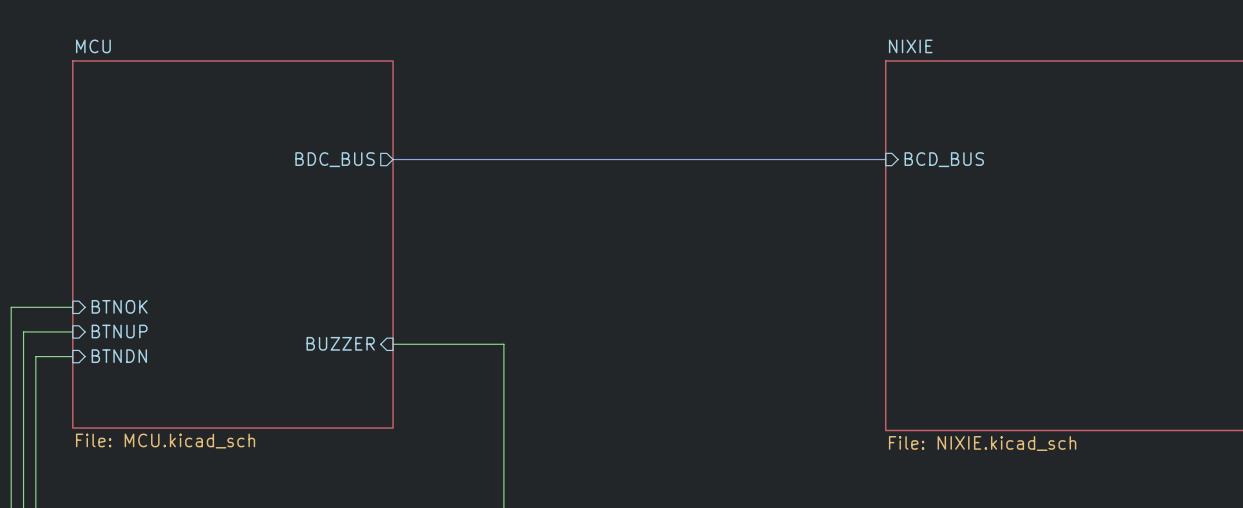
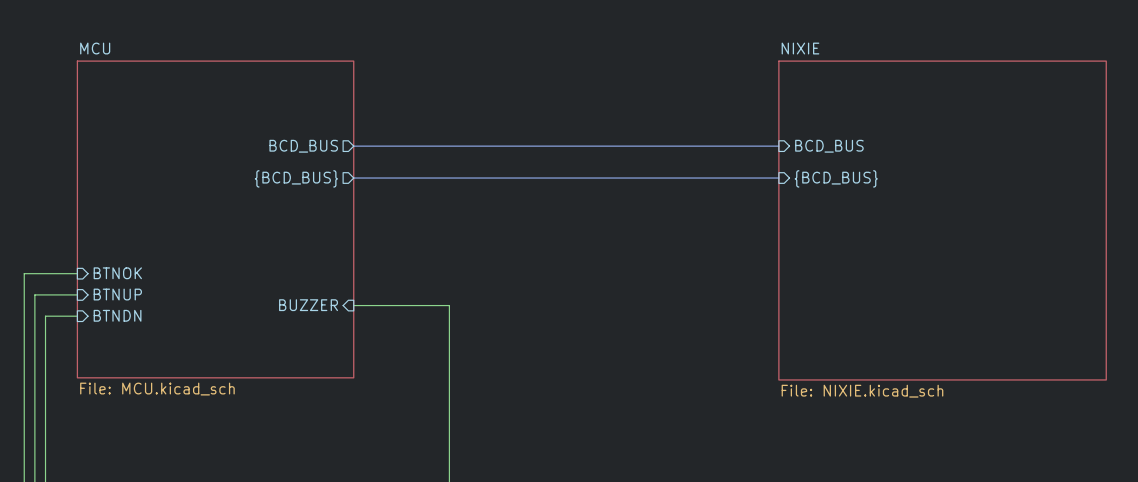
sheet pin: BDC_BUS (335, 159) -> BCD_BUS (303, 146)
bus: none -> (353, 178) (778, 178)
sheet pin: none -> {BCD_BUS} (296, 178)
sheet pin: none -> {BCD_BUS} (836, 178)

